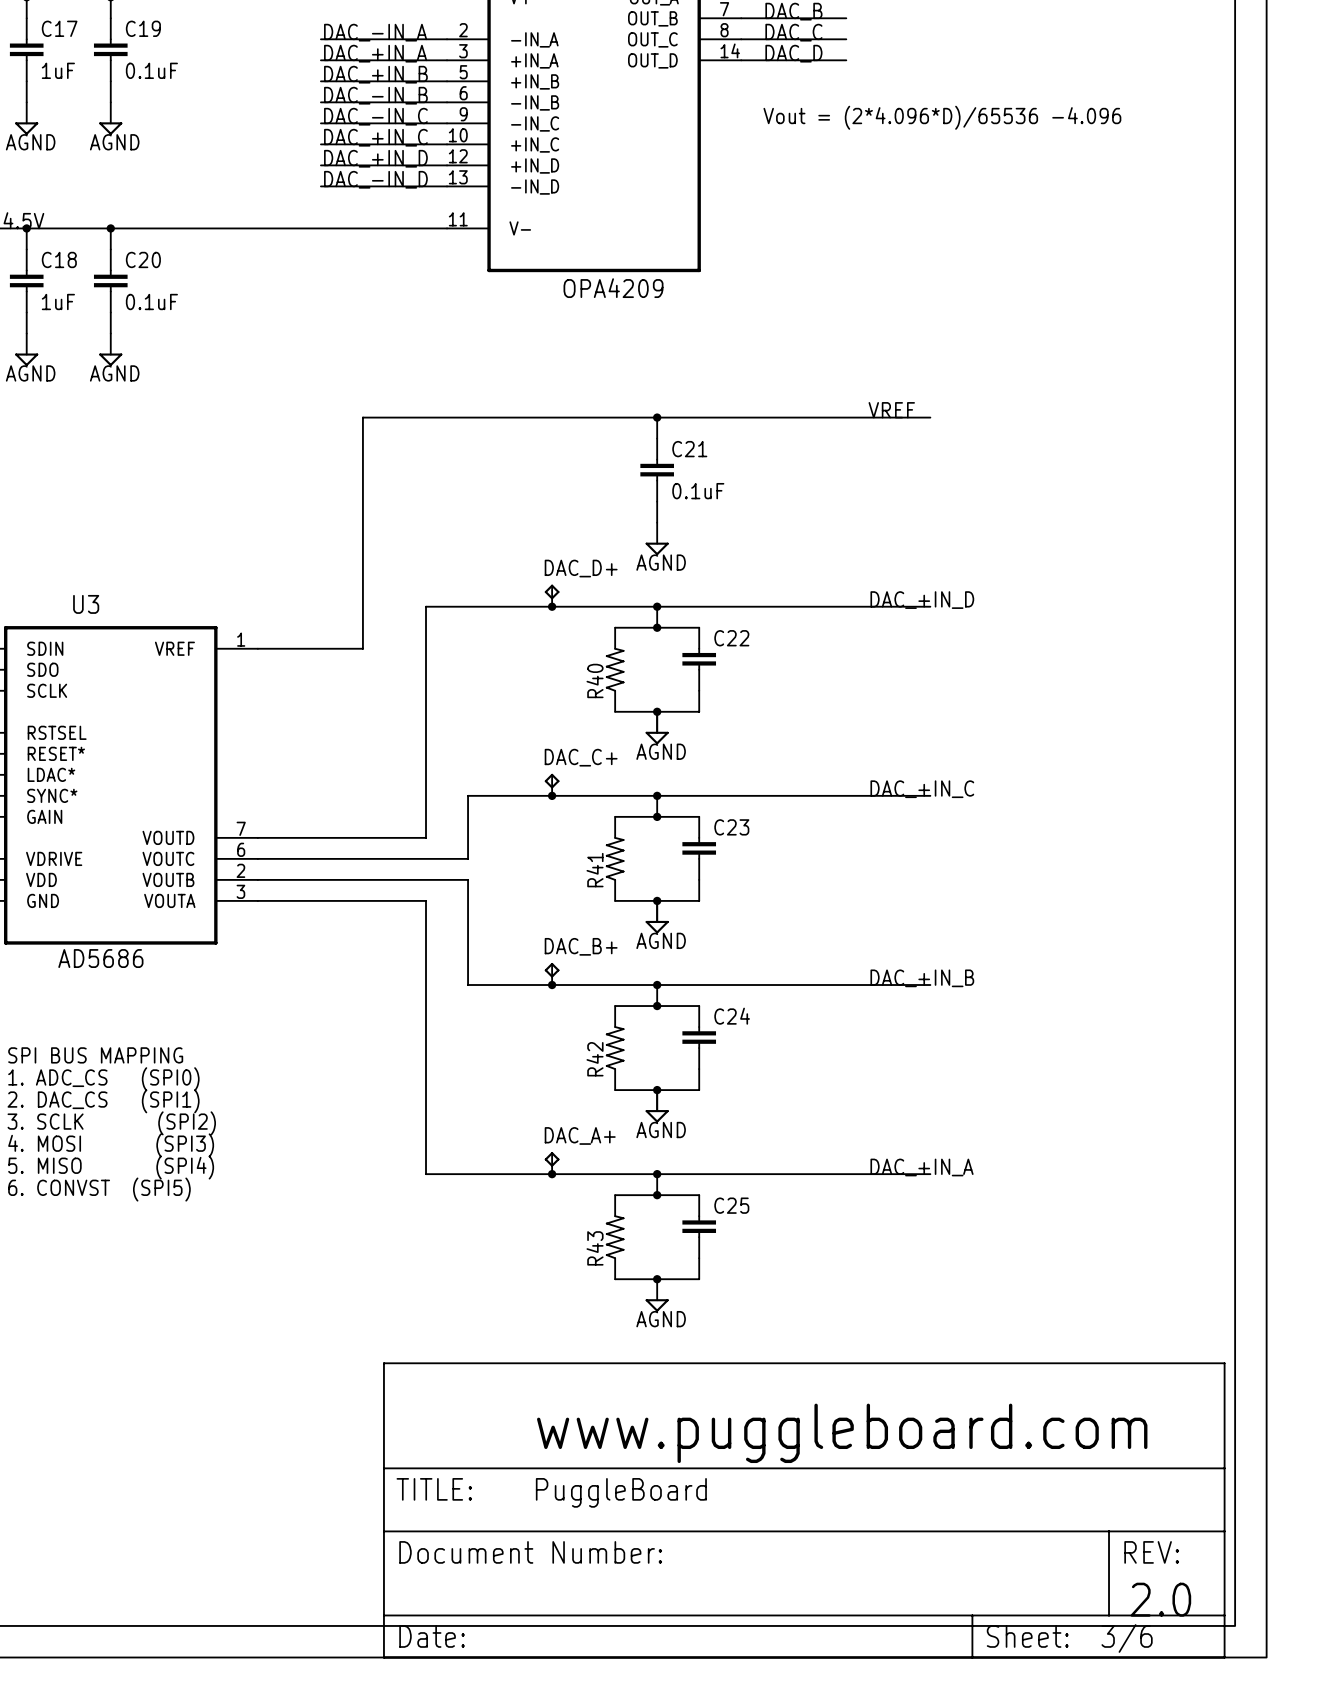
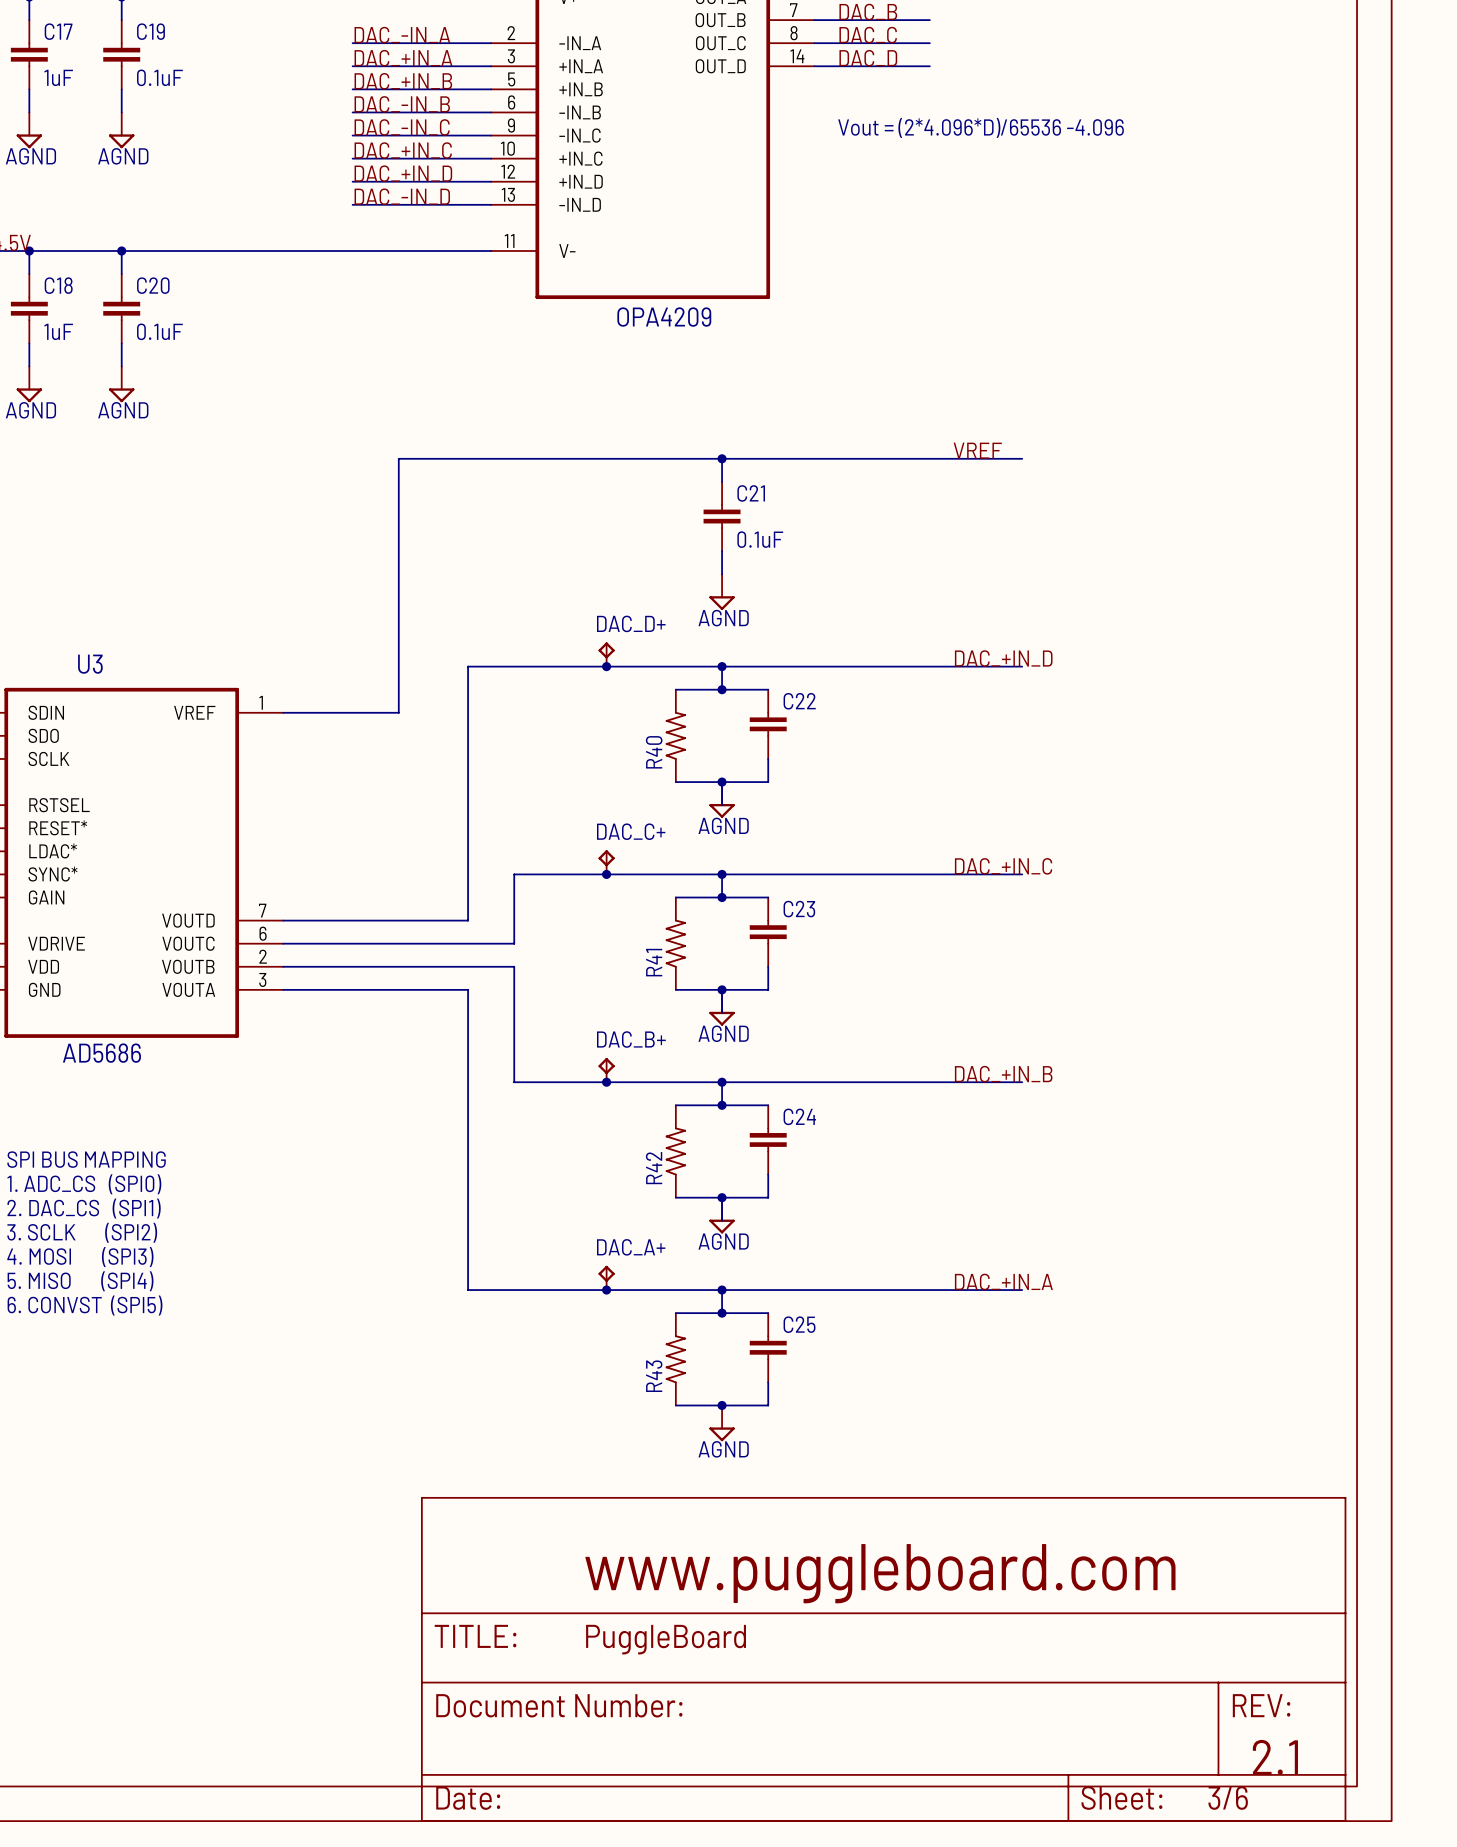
text: 2.0 (1160, 1599) -> 2.1 (1275, 1757)

